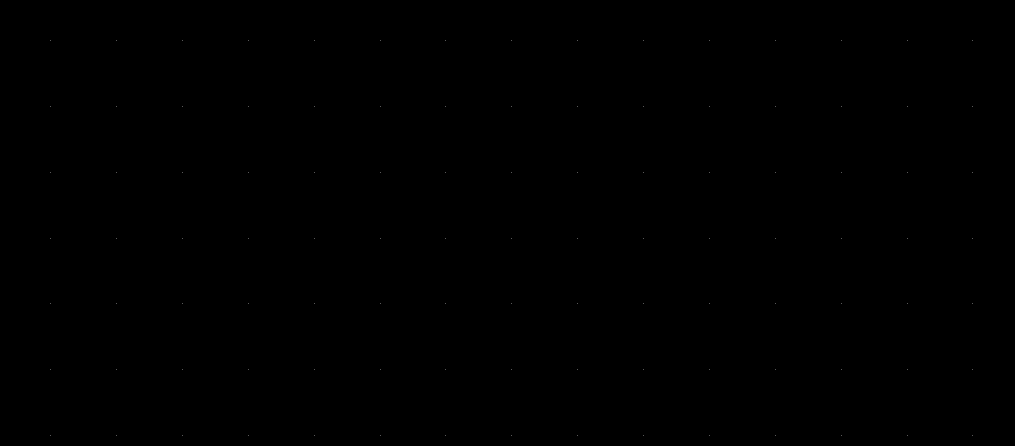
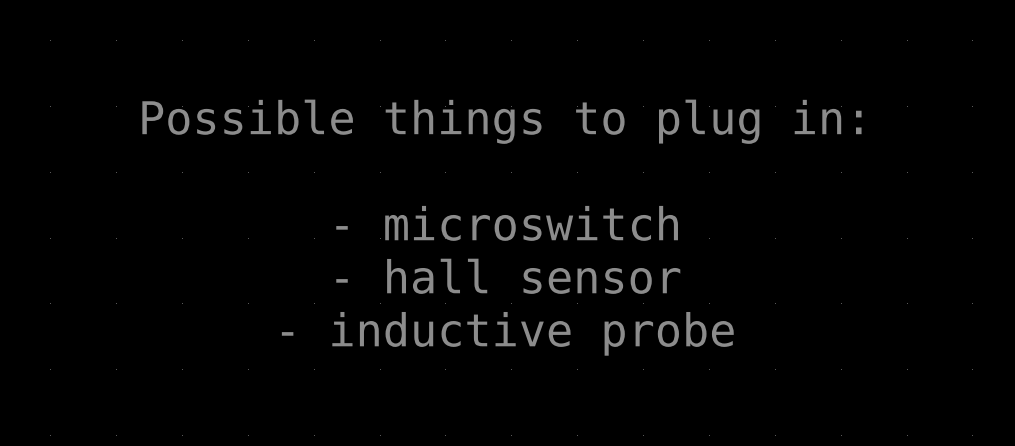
text: none -> Possible things to plug in: (501, 121)
text: none -> - microswitch (507, 223)
text: none -> - hall sensor (508, 276)
text: none -> - inductive probe (507, 333)

